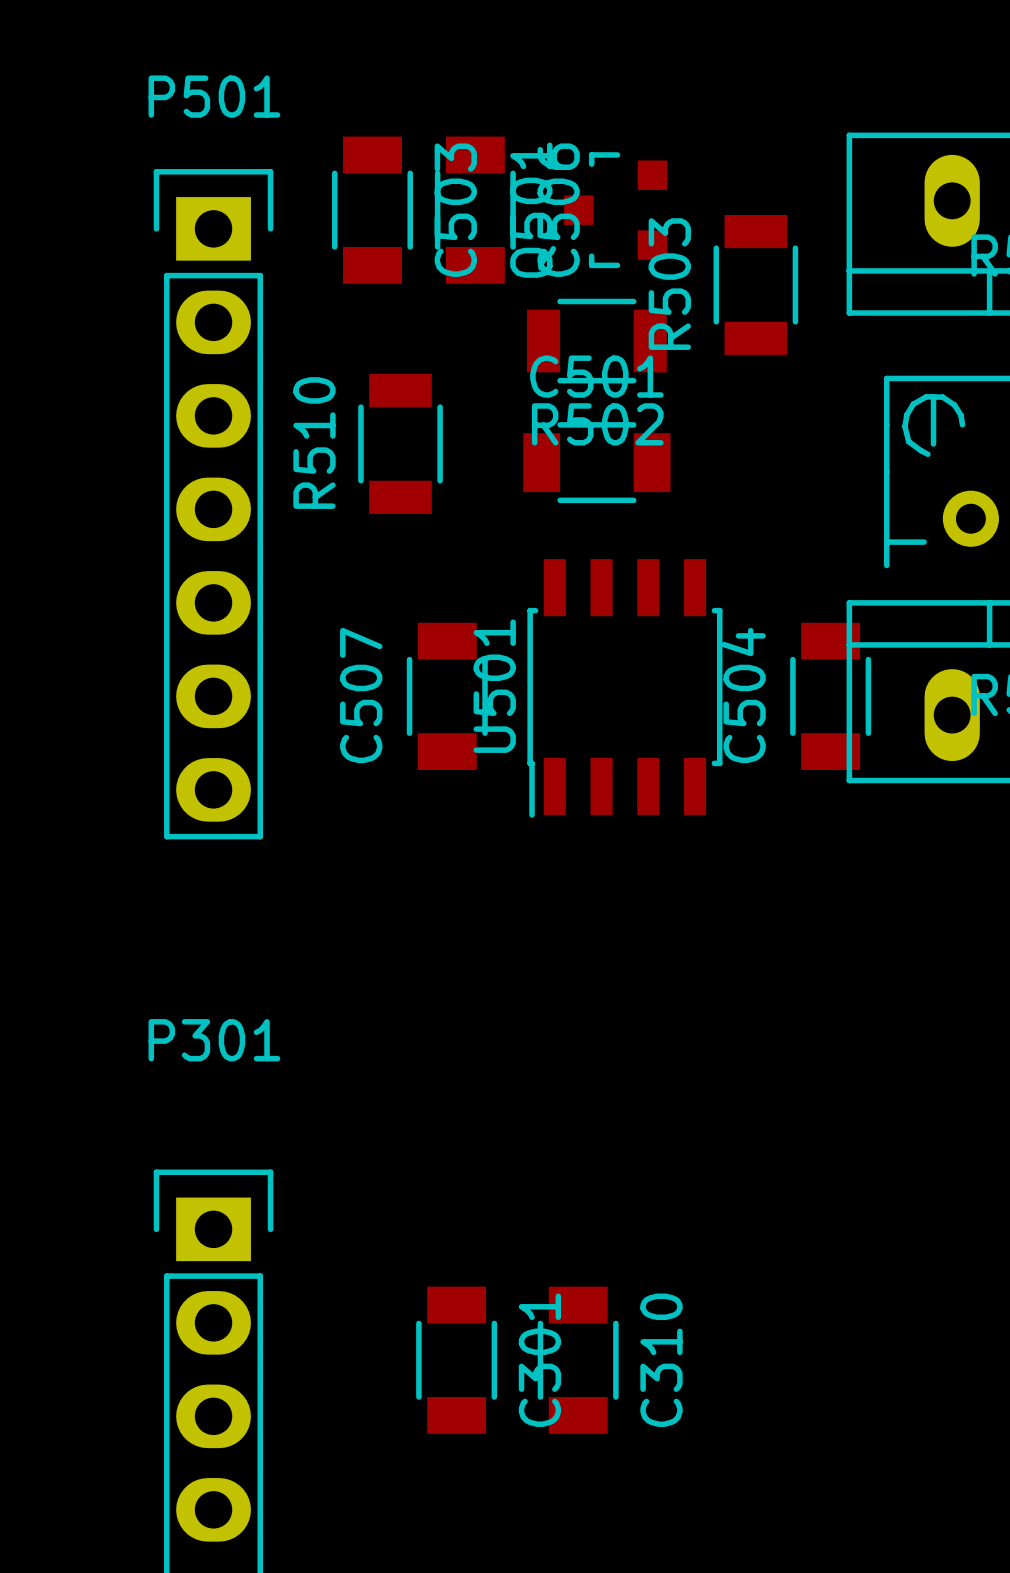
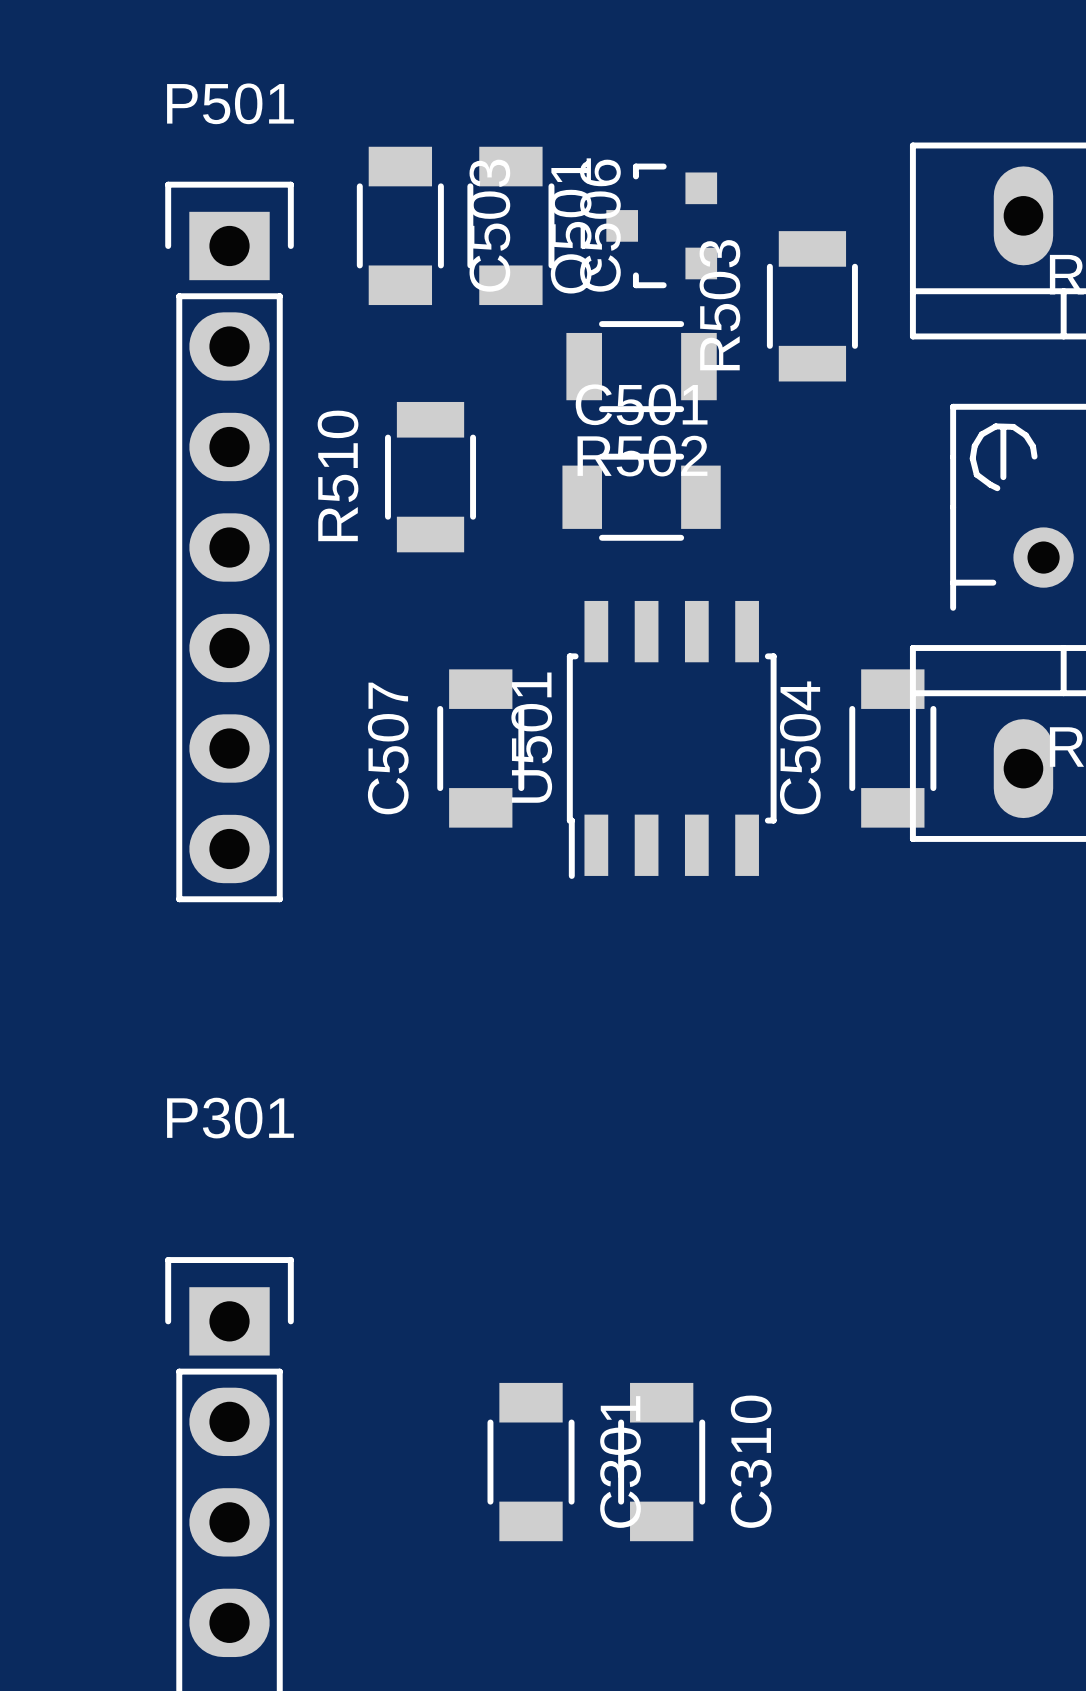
C301 position: (456, 1360) -> (531, 1462)
C310 position: (578, 1360) -> (661, 1462)

